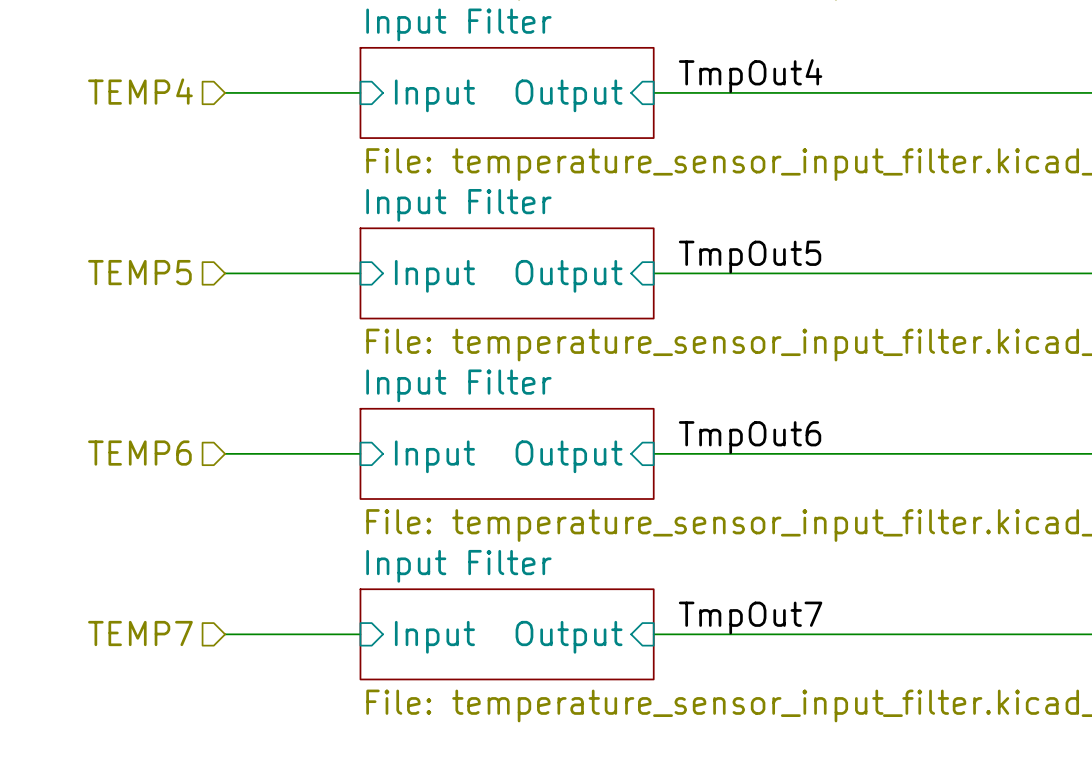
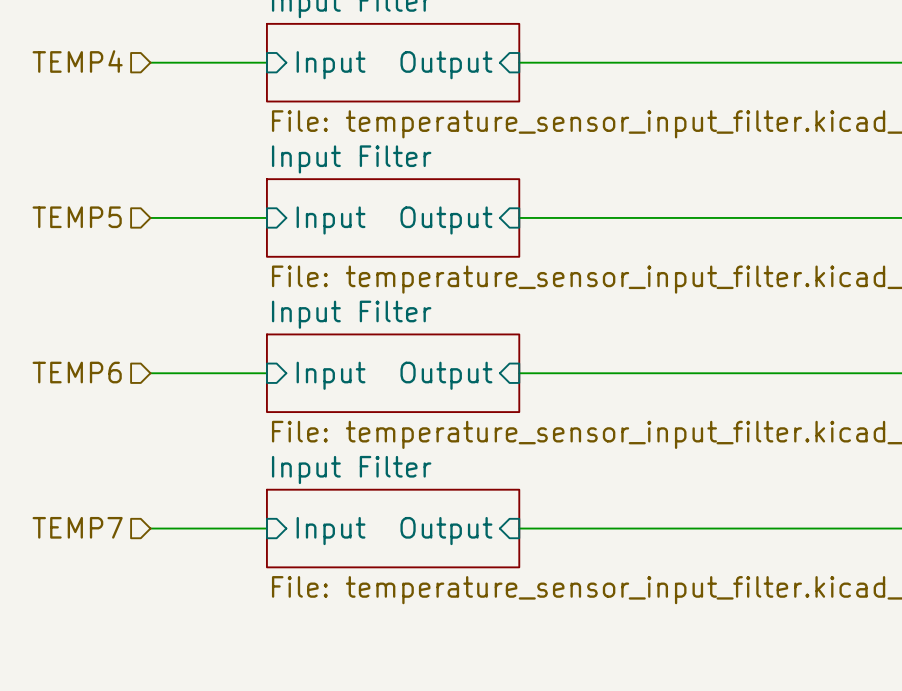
label: TmpOut4 (750, 76) -> none
label: TmpOut5 (750, 257) -> none
label: TmpOut6 (750, 437) -> none
label: TmpOut7 (750, 617) -> none

